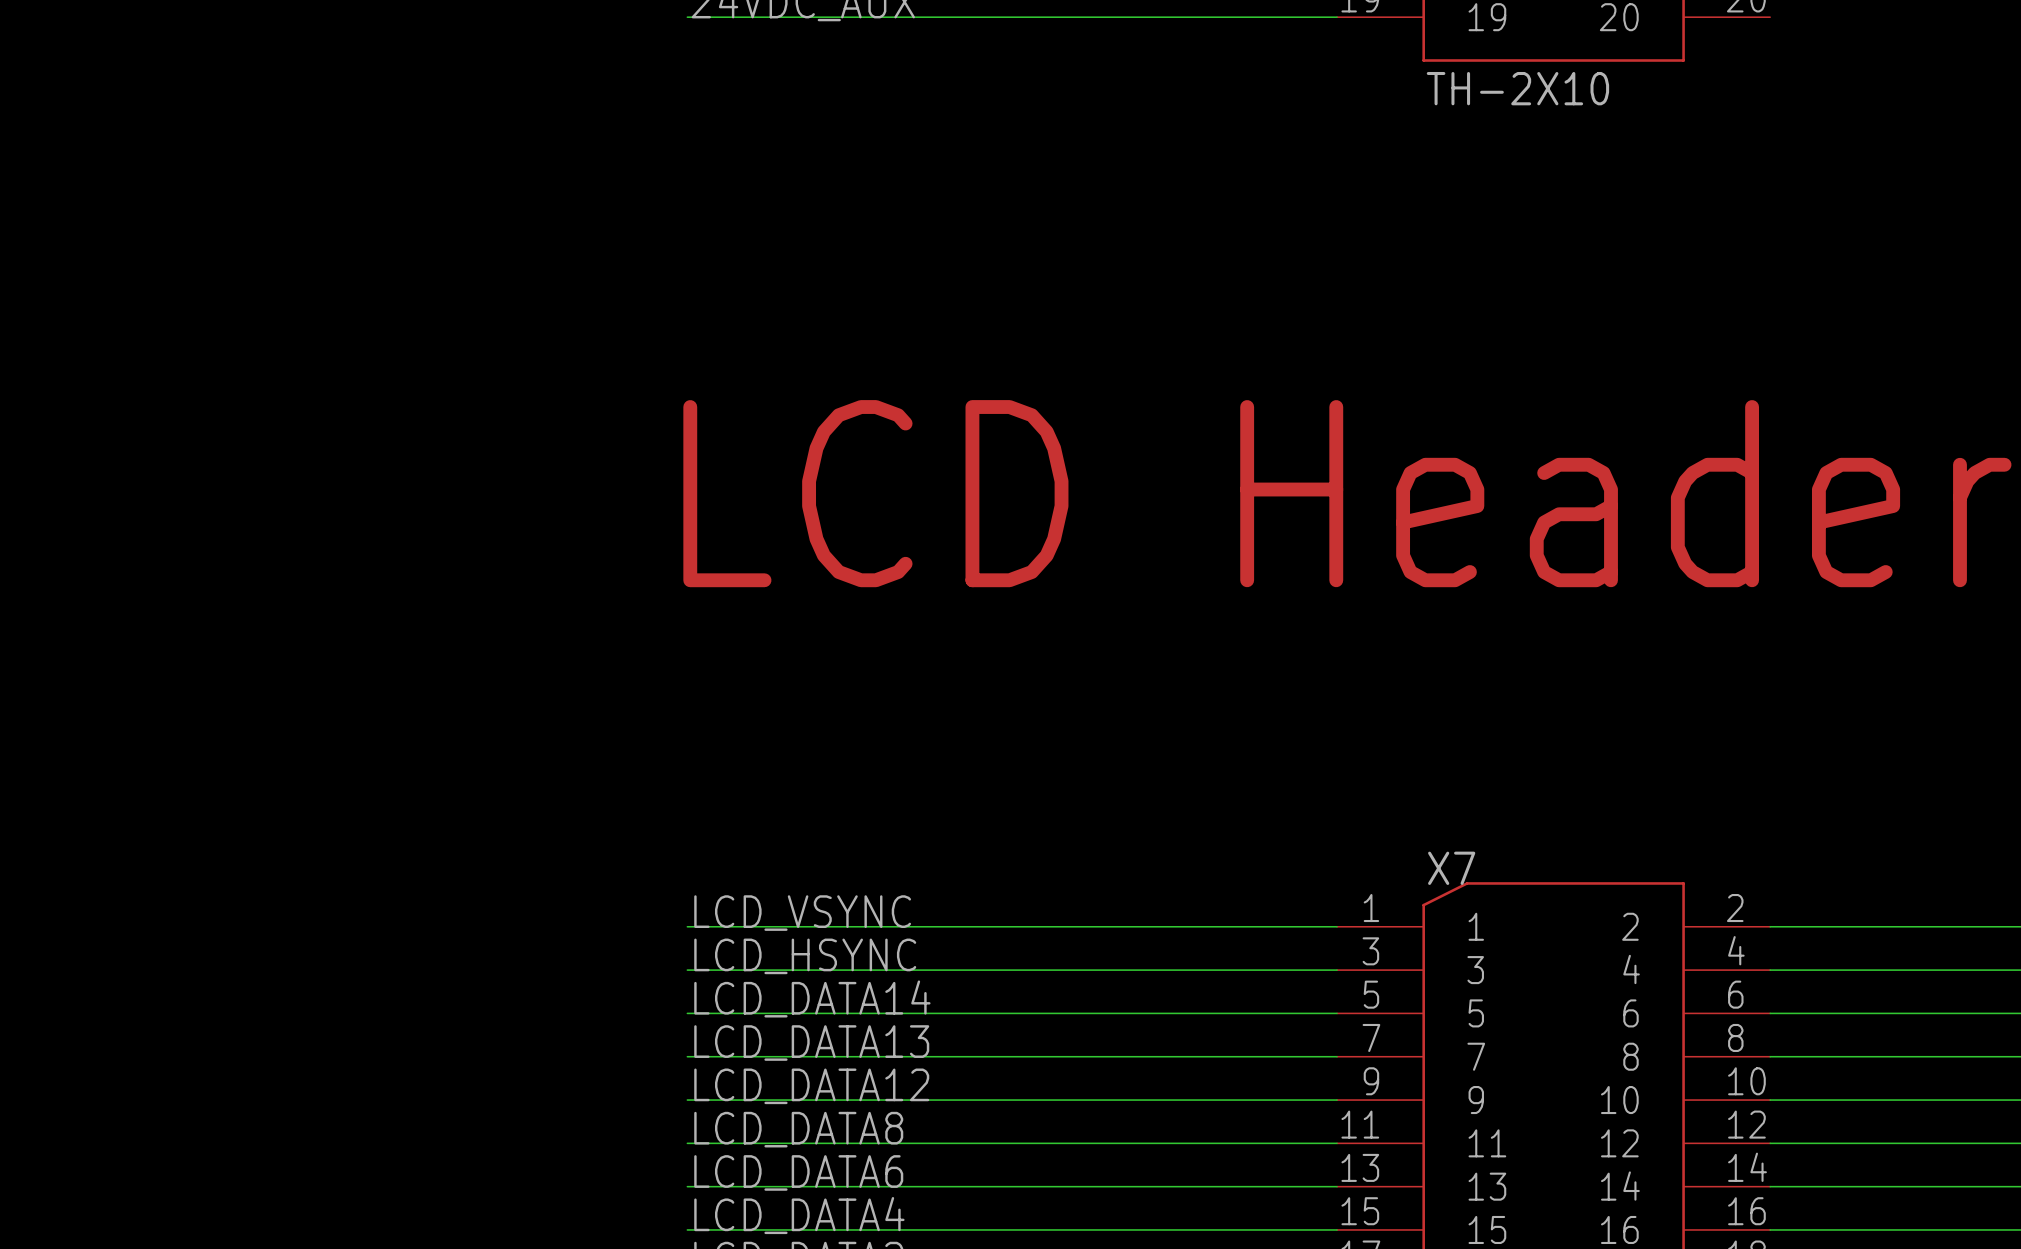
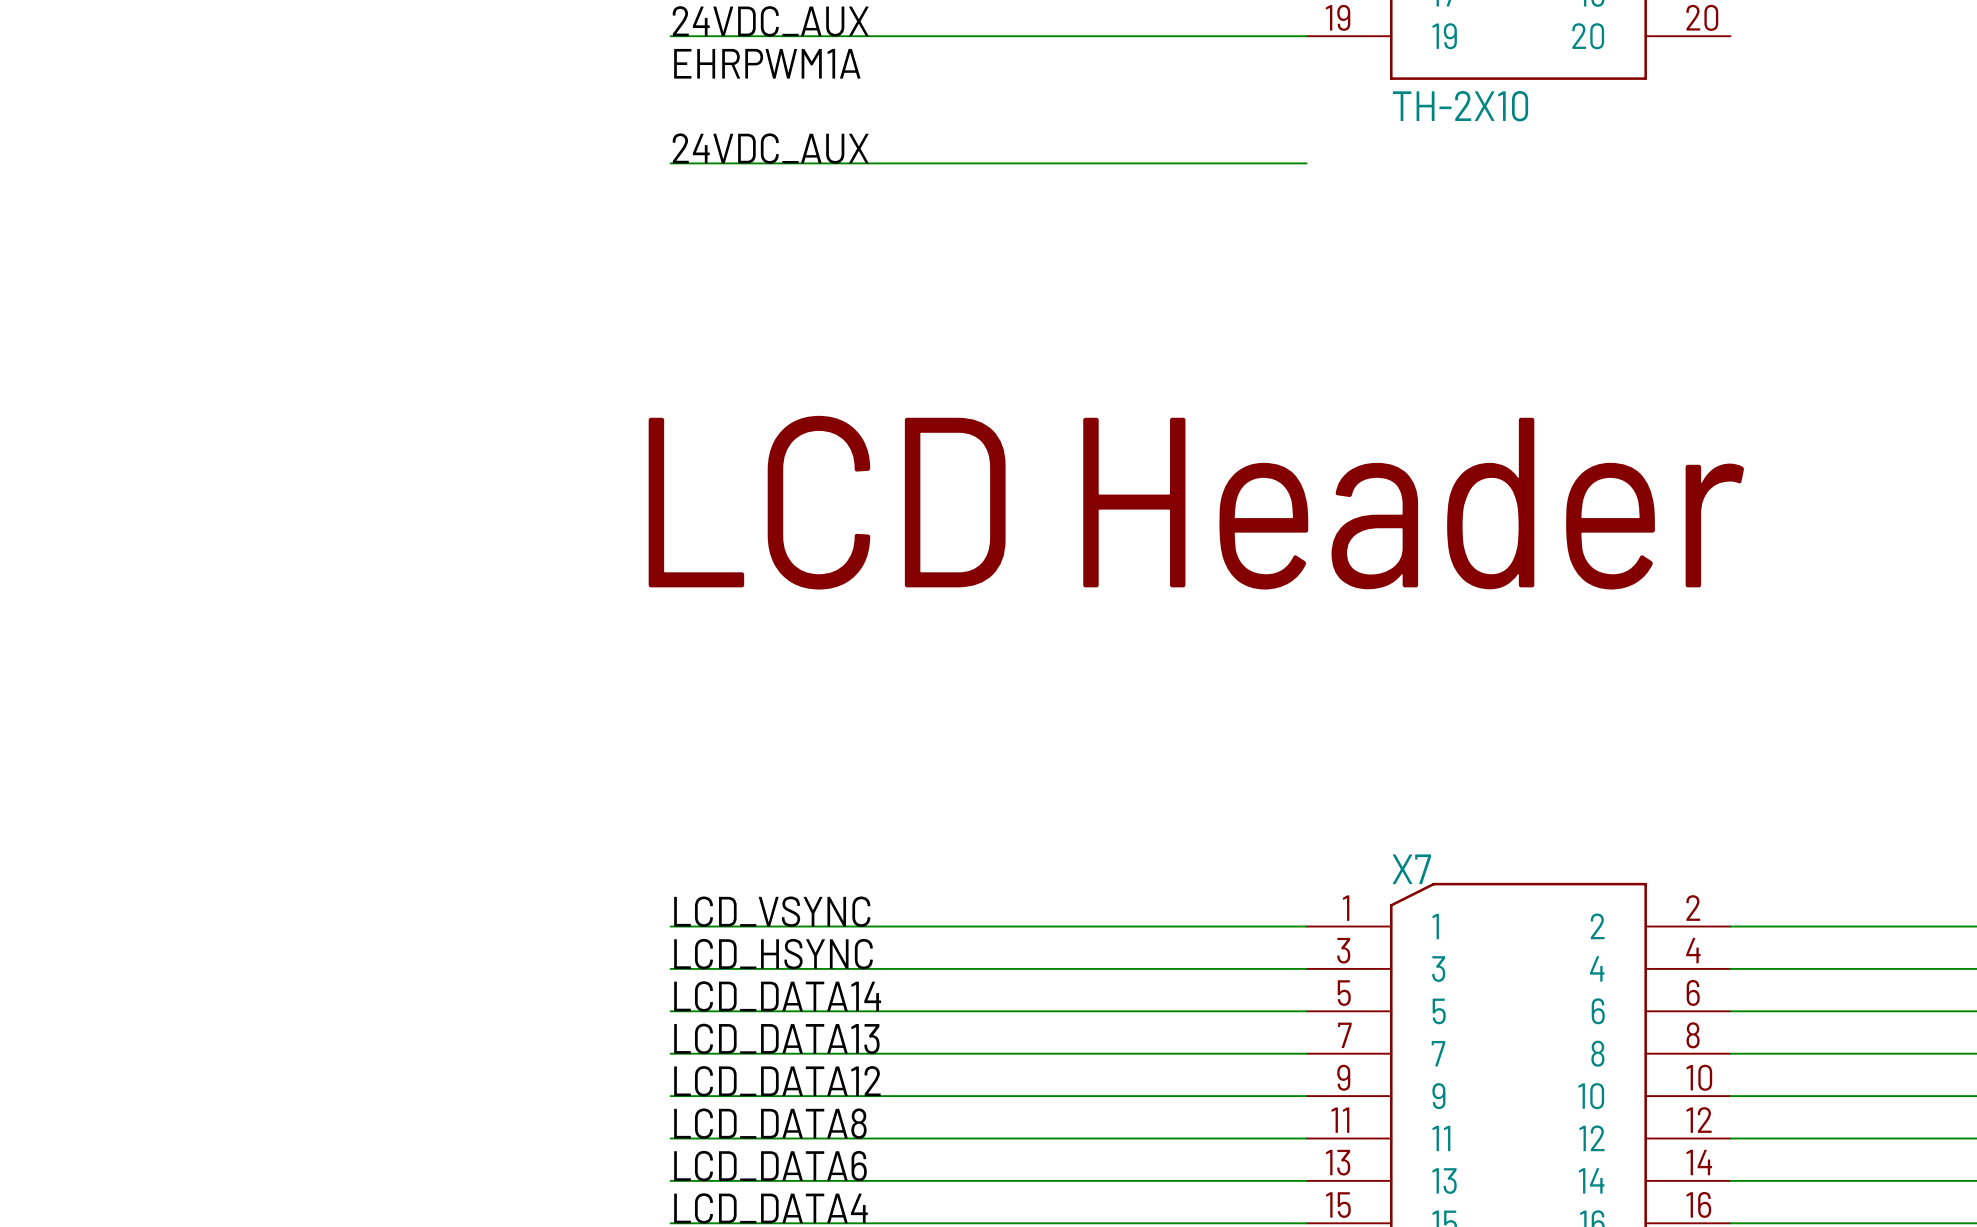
label: none -> EHRPWM1A (767, 63)
label: none -> 24VDC_AUX (770, 148)
wire: none -> (670, 163) (1306, 163)

